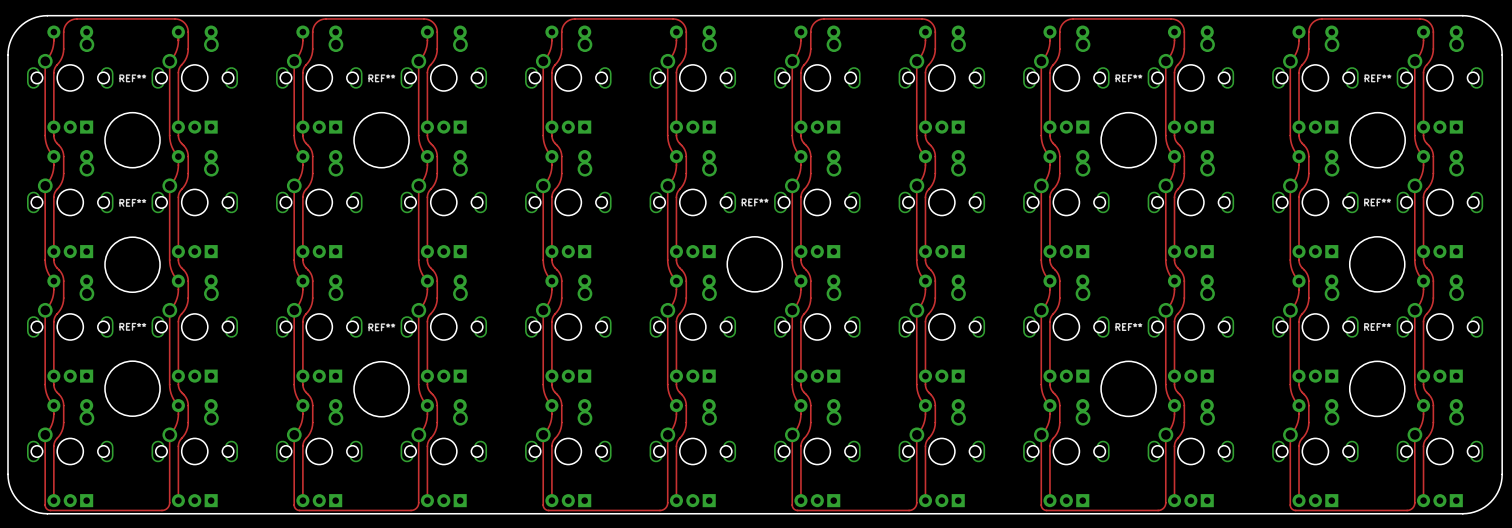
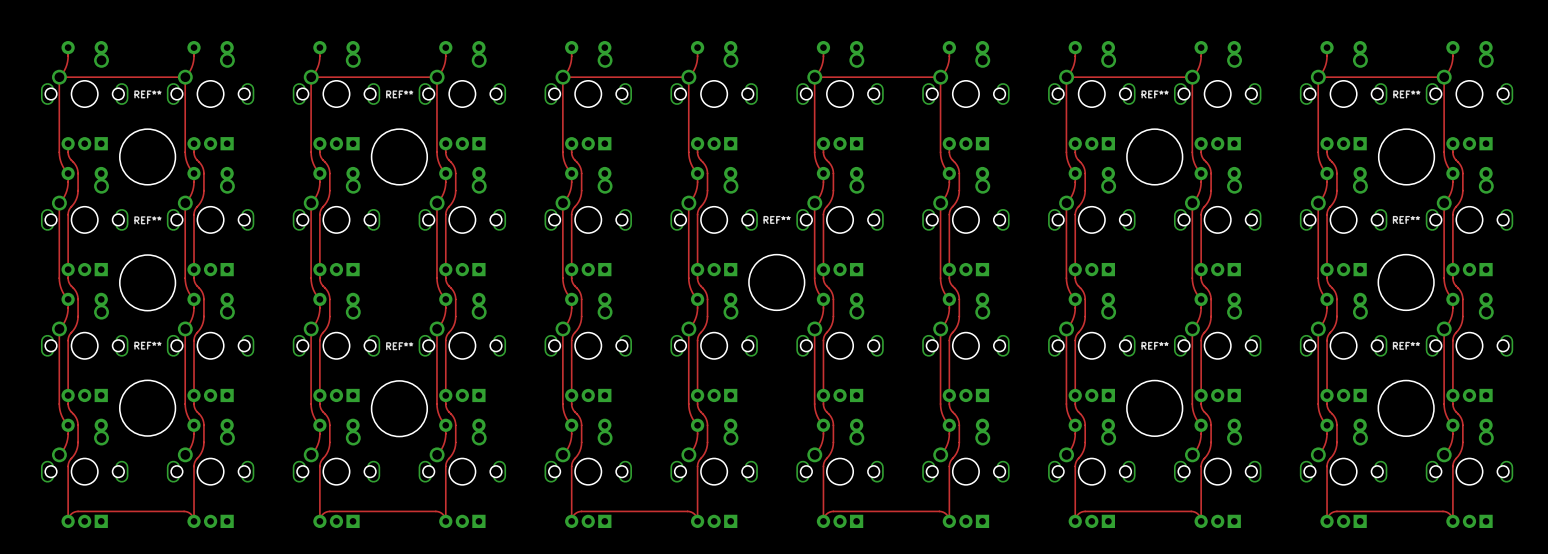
board edge: (47, 15) (1462, 15) (1474, 17) (1484, 22) (1493, 30) (1499, 39) (1501, 51) (1502, 474) (1500, 485) (1495, 496) (1487, 504) (1477, 510) (1462, 513) (47, 513) (35, 512) (25, 507) (16, 499) (10, 489) (8, 478) (7, 55) (10, 39) (19, 27) (32, 18) (47, 15) -> none
track: none -> (59, 77) (185, 77)
track: none -> (311, 77) (437, 77)
track: none -> (563, 77) (688, 77)
track: none -> (814, 77) (940, 77)
track: none -> (1066, 77) (1192, 77)
track: none -> (1318, 77) (1444, 77)
track: (53, 127) (54, 69) (62, 54) (65, 26) (69, 20) (76, 18) (175, 18) (184, 22) (188, 30) (188, 49) (186, 57) (178, 71) (178, 127) -> none
track: (302, 127) (303, 69) (311, 54) (314, 26) (318, 20) (325, 18) (424, 18) (433, 22) (437, 30) (437, 49) (435, 57) (427, 71) (427, 127) -> none
track: (551, 127) (552, 69) (560, 54) (563, 26) (567, 20) (574, 18) (673, 18) (682, 22) (686, 30) (686, 49) (684, 57) (676, 71) (676, 127) -> none
track: (800, 127) (801, 69) (810, 54) (812, 26) (816, 20) (823, 18) (922, 18) (931, 22) (935, 30) (935, 49) (933, 57) (925, 71) (925, 127) -> none
track: (1049, 127) (1050, 69) (1059, 54) (1061, 26) (1065, 20) (1072, 18) (1171, 18) (1180, 22) (1184, 30) (1184, 49) (1182, 57) (1174, 71) (1174, 127) -> none
track: (1299, 127) (1299, 69) (1308, 54) (1310, 26) (1314, 20) (1321, 18) (1420, 18) (1429, 22) (1433, 30) (1433, 49) (1431, 57) (1423, 71) (1423, 127) -> none
track: (45, 435) (45, 505) (50, 510) (166, 509) (169, 502) (169, 435) -> none
track: (294, 435) (294, 505) (299, 510) (415, 509) (418, 502) (418, 435) -> none
track: (543, 435) (543, 505) (548, 510) (664, 509) (667, 502) (667, 435) -> none
track: (792, 435) (792, 505) (797, 510) (913, 509) (916, 502) (916, 435) -> none
track: (1041, 435) (1041, 505) (1046, 510) (1162, 509) (1165, 502) (1165, 435) -> none
track: (1290, 435) (1290, 505) (1295, 510) (1411, 509) (1414, 502) (1414, 435) -> none
track: none -> (68, 521) (71, 514) (78, 511) (185, 511) (191, 514) (194, 521)
track: none -> (319, 521) (322, 514) (329, 511) (437, 511) (443, 515) (445, 521)
track: none -> (571, 521) (574, 514) (581, 511) (688, 511) (694, 514) (697, 521)
track: none -> (823, 521) (826, 514) (833, 511) (940, 511) (946, 514) (949, 521)
track: none -> (1075, 521) (1078, 514) (1085, 511) (1192, 511) (1198, 514) (1201, 521)
track: none -> (1327, 521) (1329, 514) (1336, 511) (1444, 511) (1450, 515) (1452, 521)

